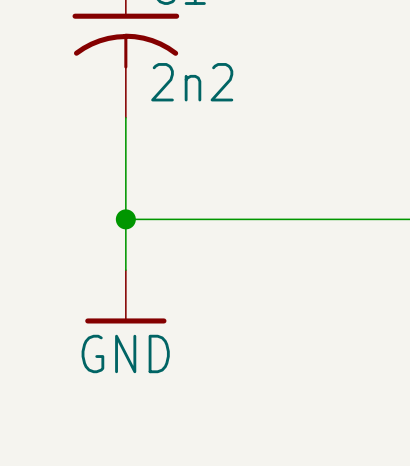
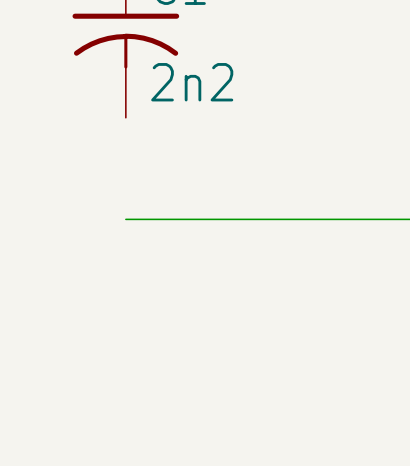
wire: (125, 117) (125, 270) -> none
junction: (125, 219) -> none
power symbol: GND (125, 296) -> none

